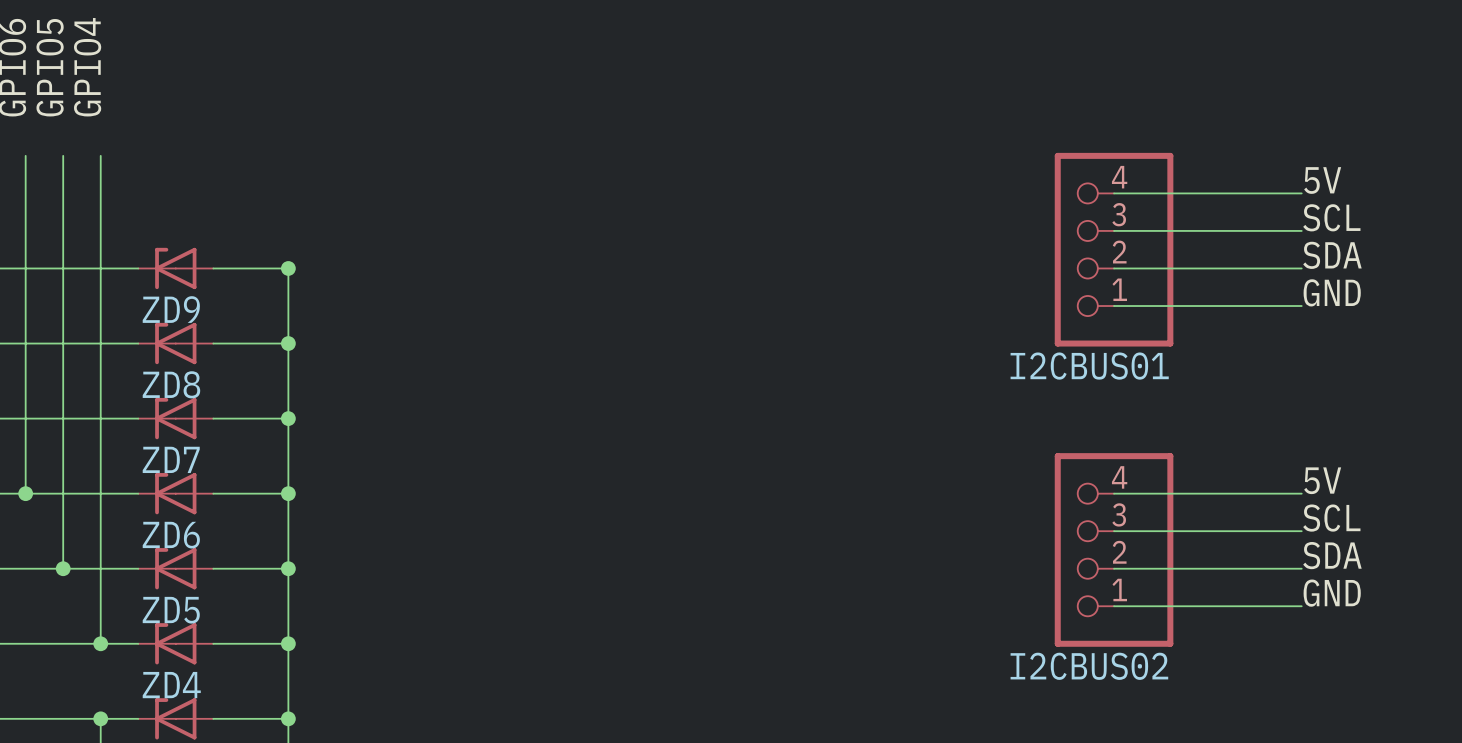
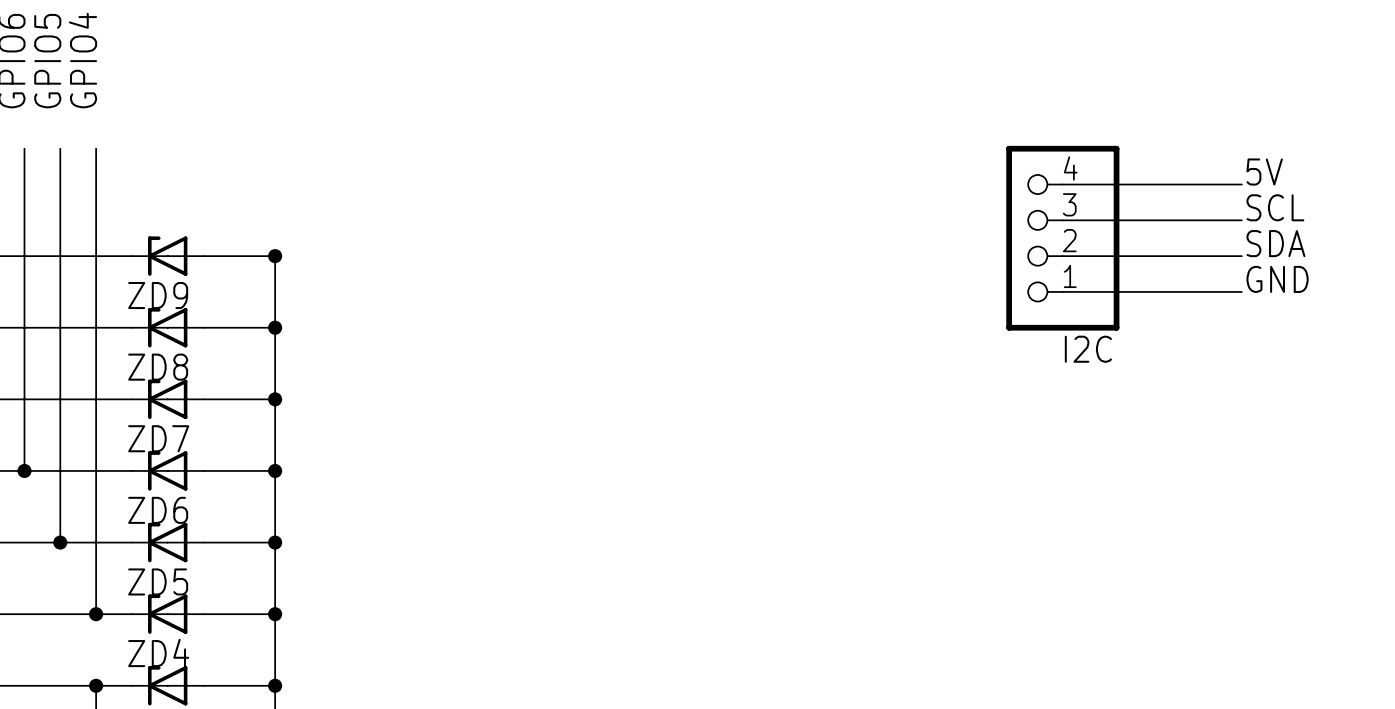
I2CBUS01 name: I2CBUS01 (1089, 366) -> I2C (1088, 349)
label: 5V (1322, 480) -> none
wire: (1114, 493) (1301, 493) -> none
label: SCL (1331, 518) -> none
wire: (1114, 531) (1301, 531) -> none
I2CBUS02: (1114, 549) -> none
label: SDA (1332, 555) -> none
wire: (1114, 568) (1301, 568) -> none
label: GND (1332, 593) -> none
wire: (1114, 606) (1301, 606) -> none

